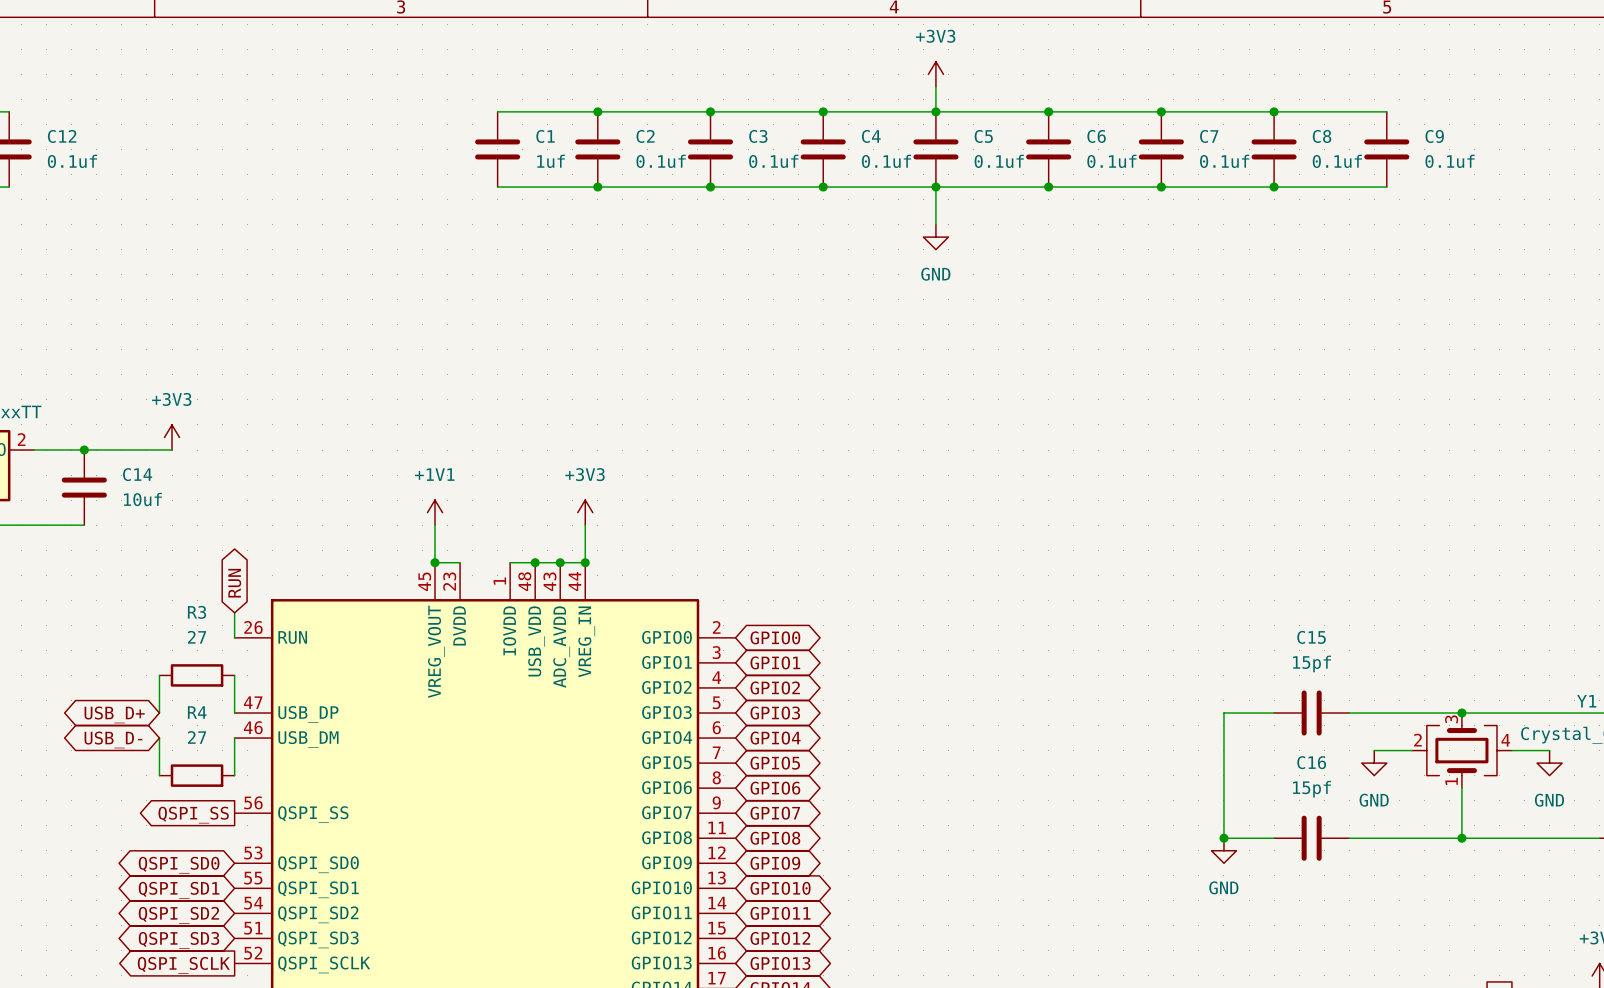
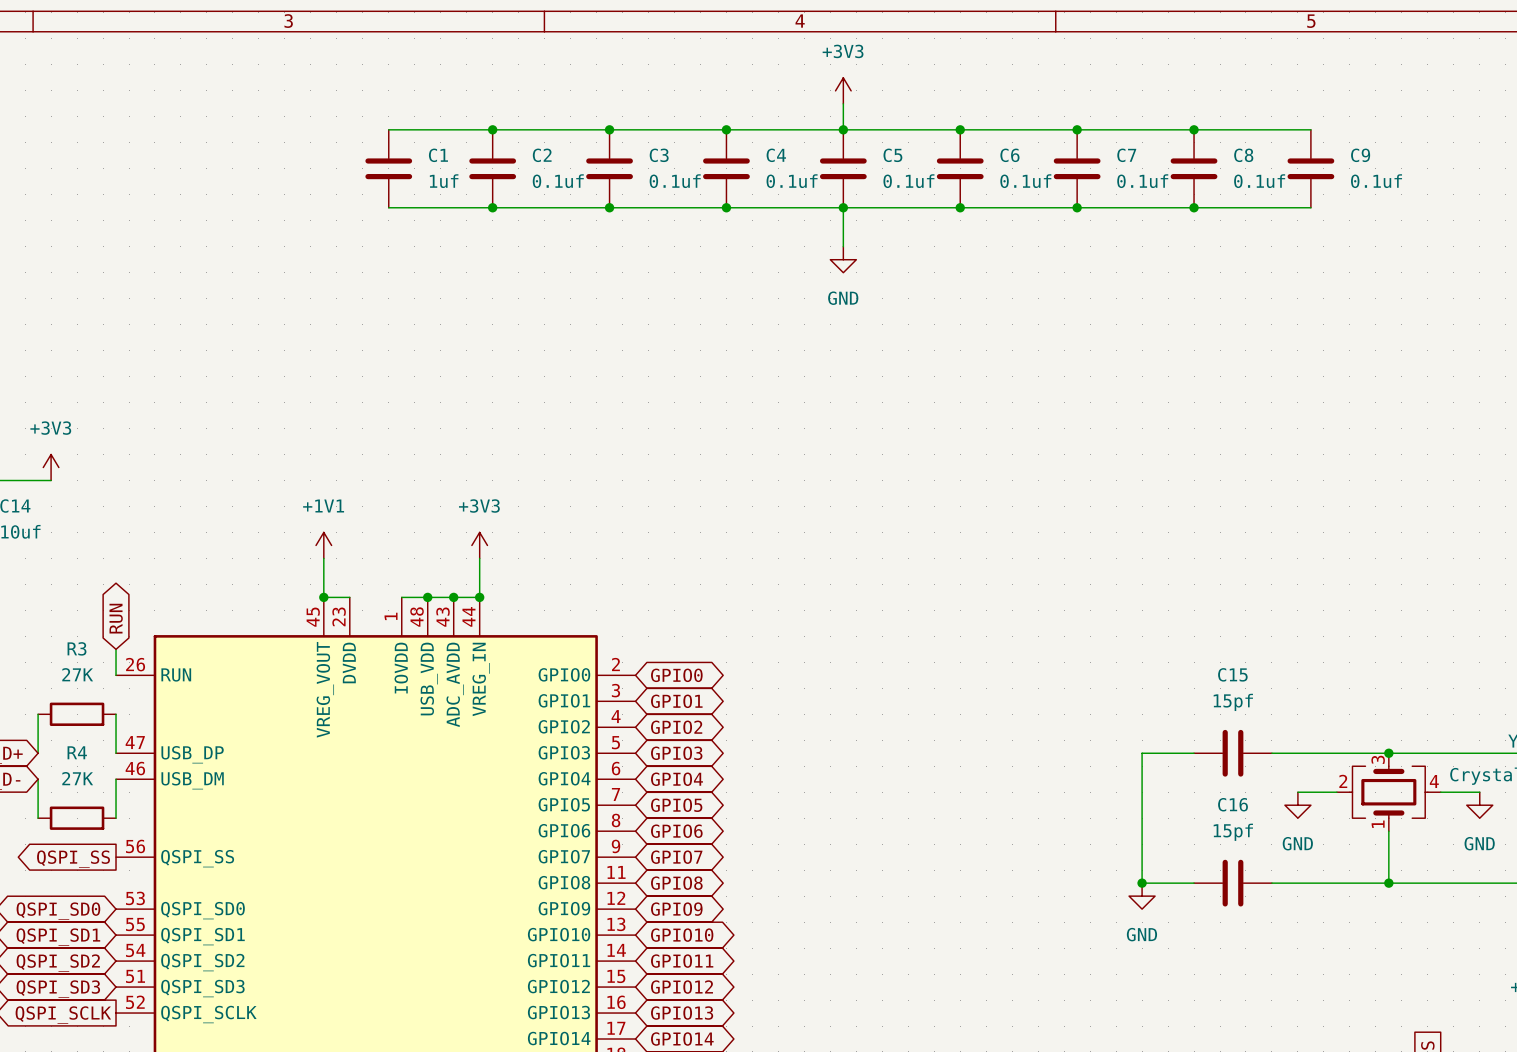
R3 value: 27 (197, 637) -> 27K (77, 674)
R4 value: 27 (197, 737) -> 27K (77, 778)

